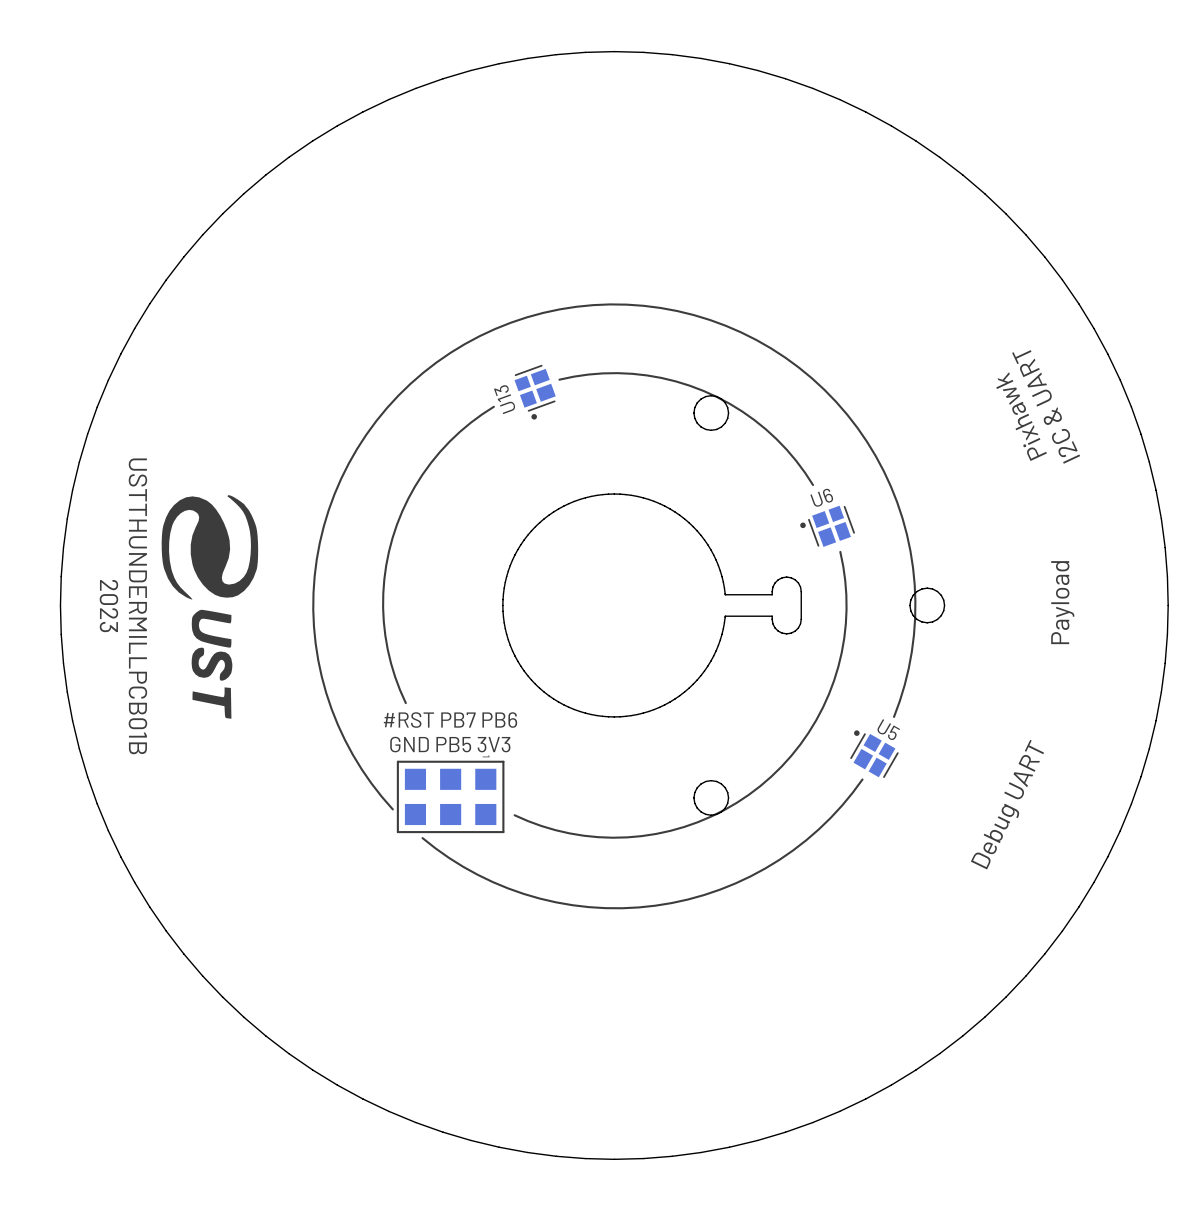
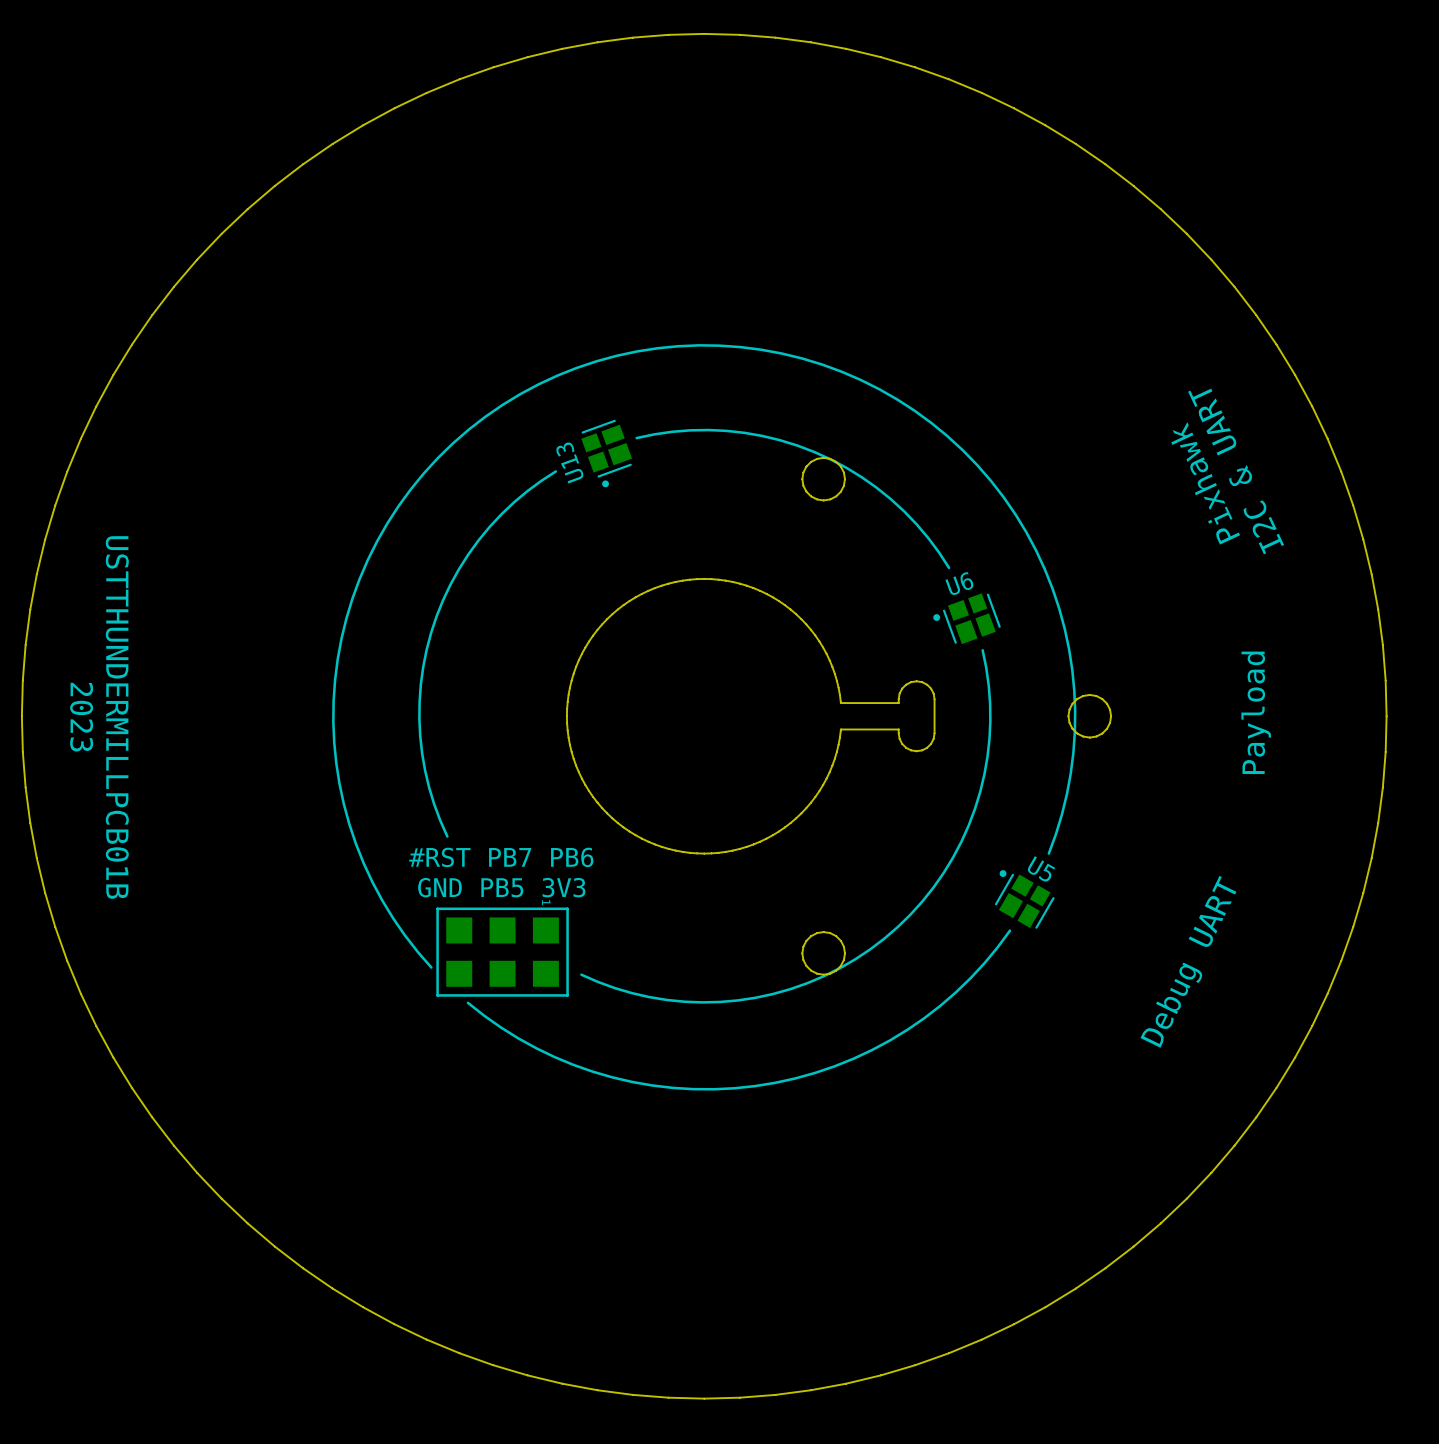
drawing: [161, 495, 259, 719] -> none

